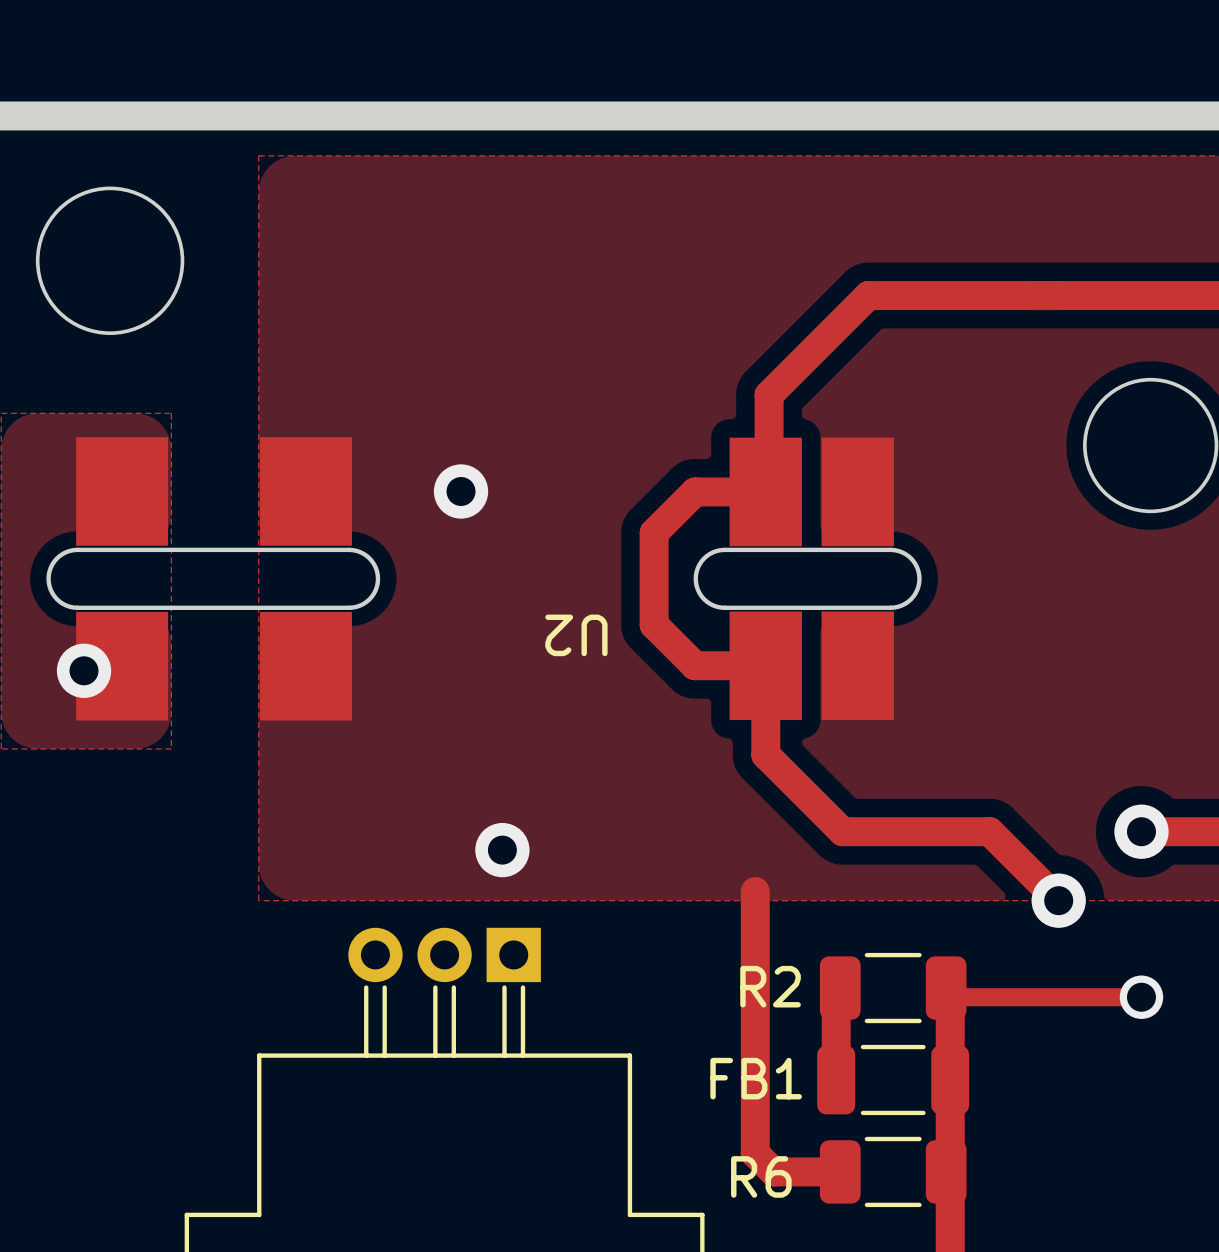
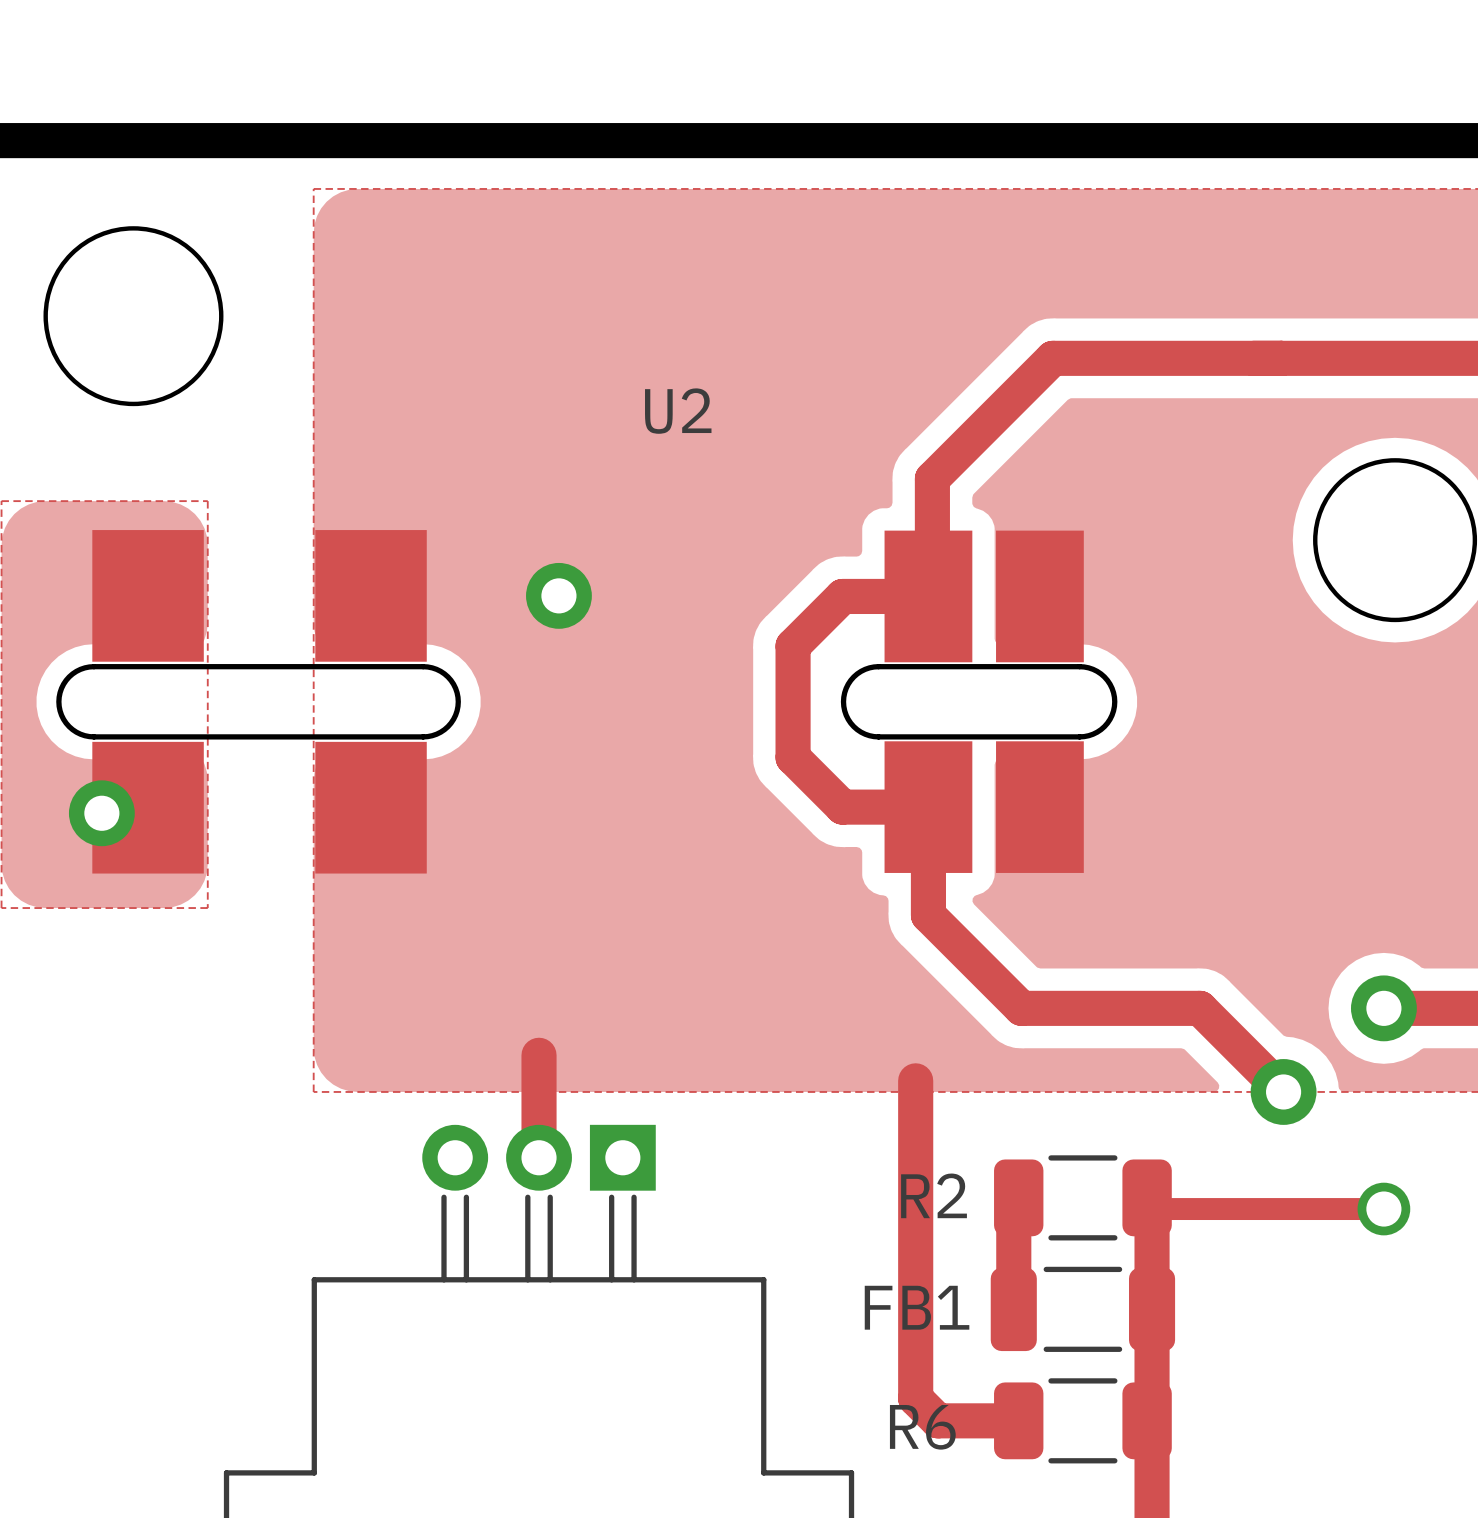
U2 name rotation: 0° (576, 635) -> 180° (678, 411)
U2 name position: U2 (576, 635) -> U2 (678, 411)
via: (502, 850) -> none
track: none -> (539, 1055) (539, 1157)

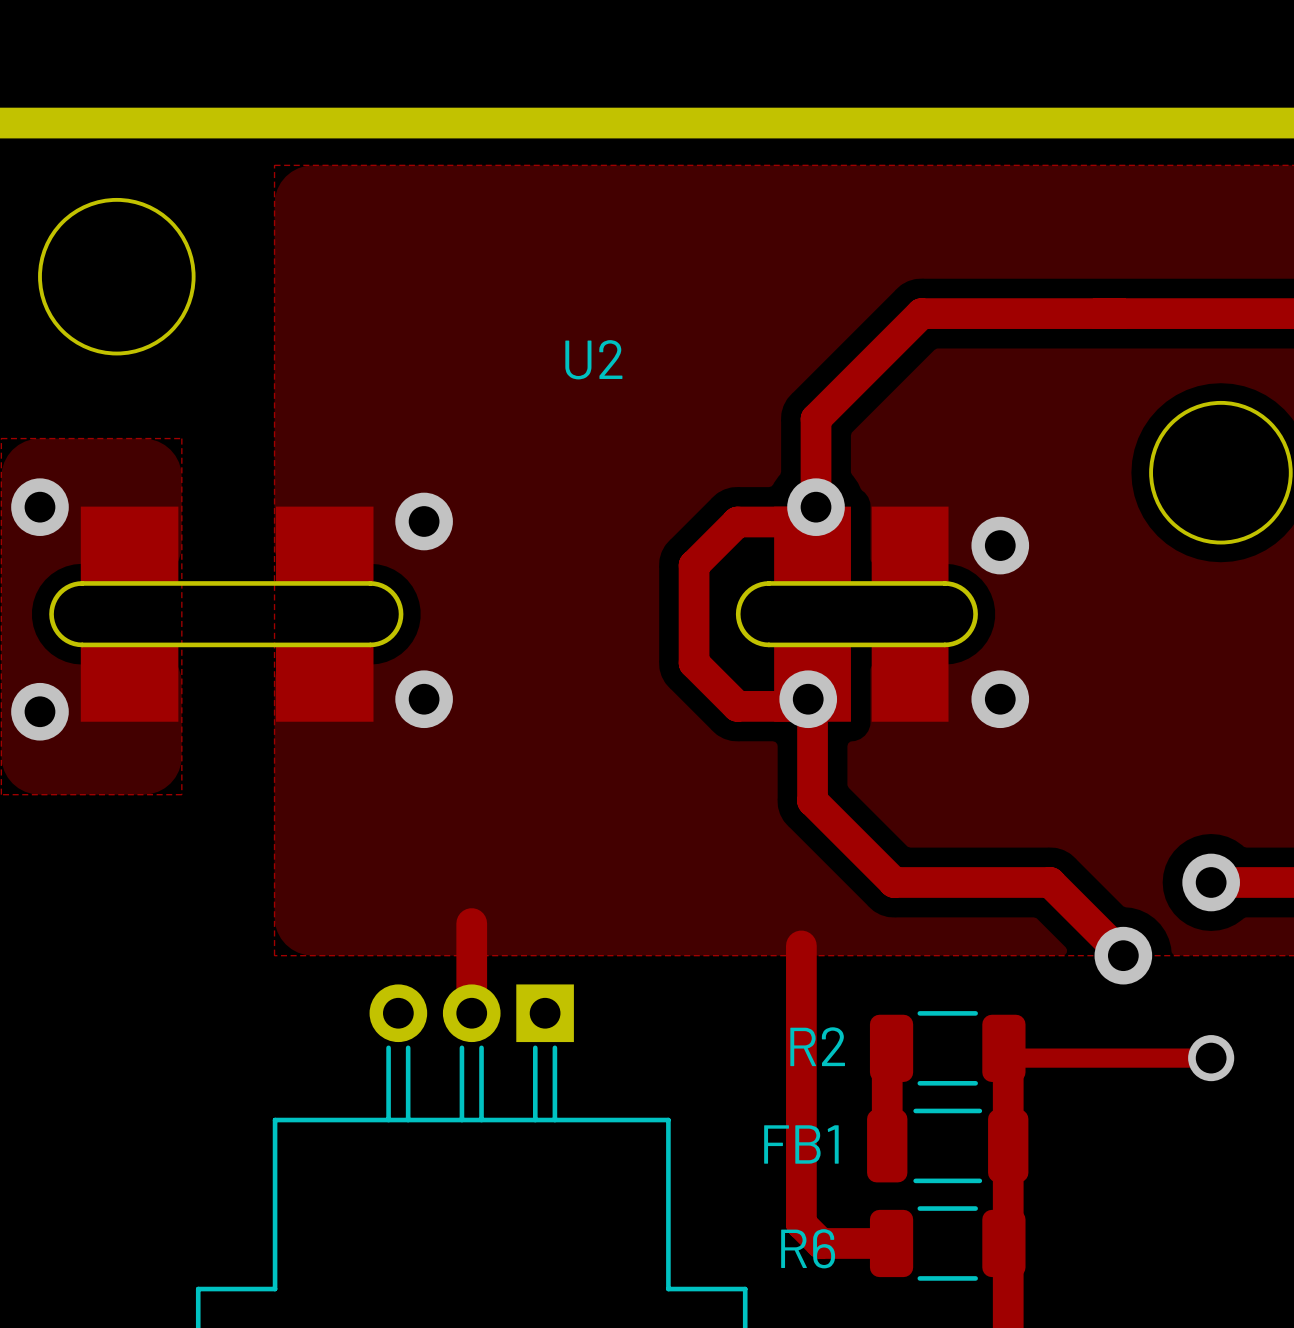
U2 footprint: [56, 530, 1118, 874] -> [49, 506, 978, 722]
via: none -> (39, 507)
via: none -> (816, 507)
via position: (558, 595) -> (424, 521)
via: none -> (1000, 545)
via: none -> (424, 699)
via: none -> (808, 699)
via: none -> (1000, 699)
via position: (101, 813) -> (39, 711)

